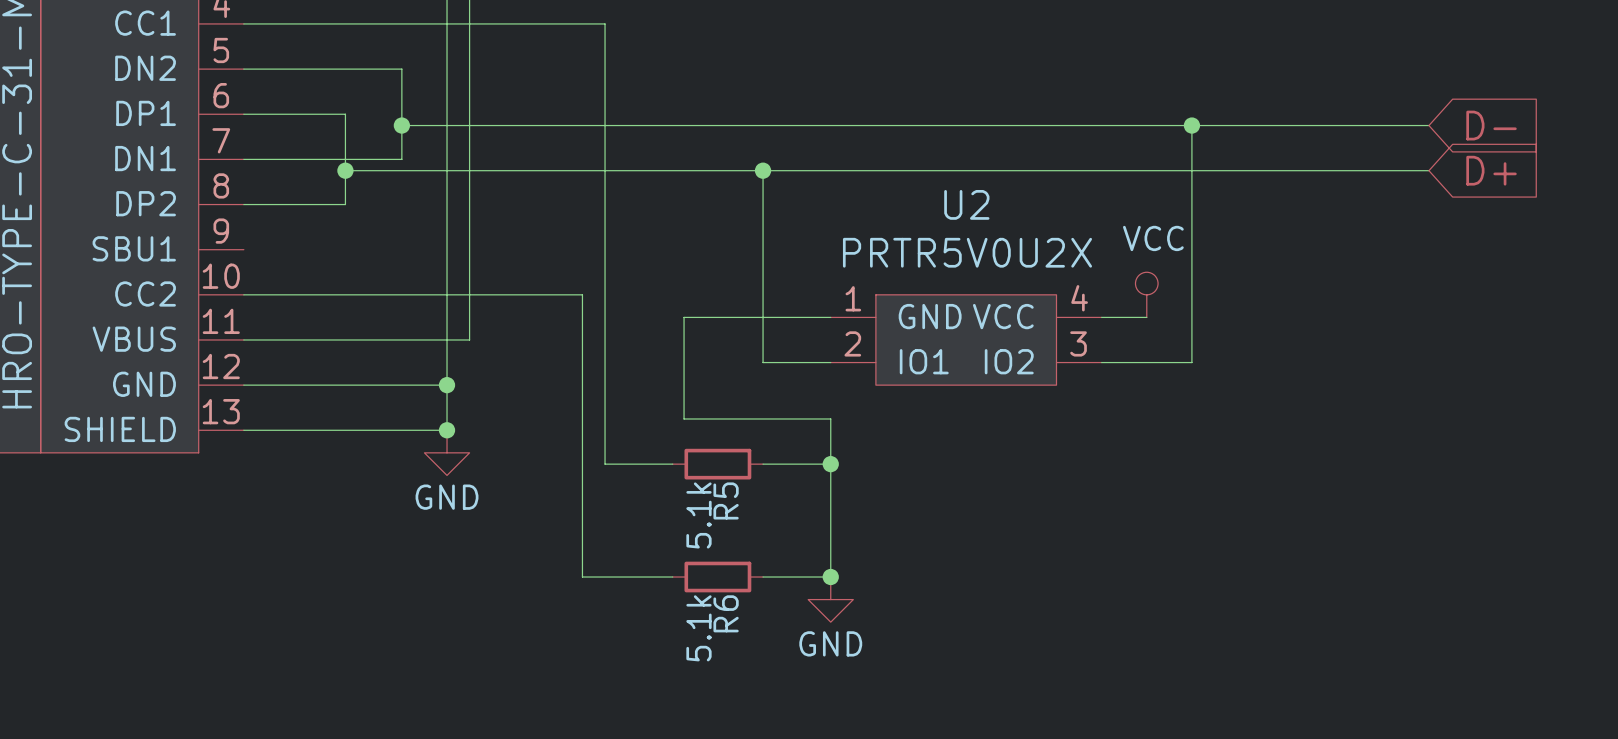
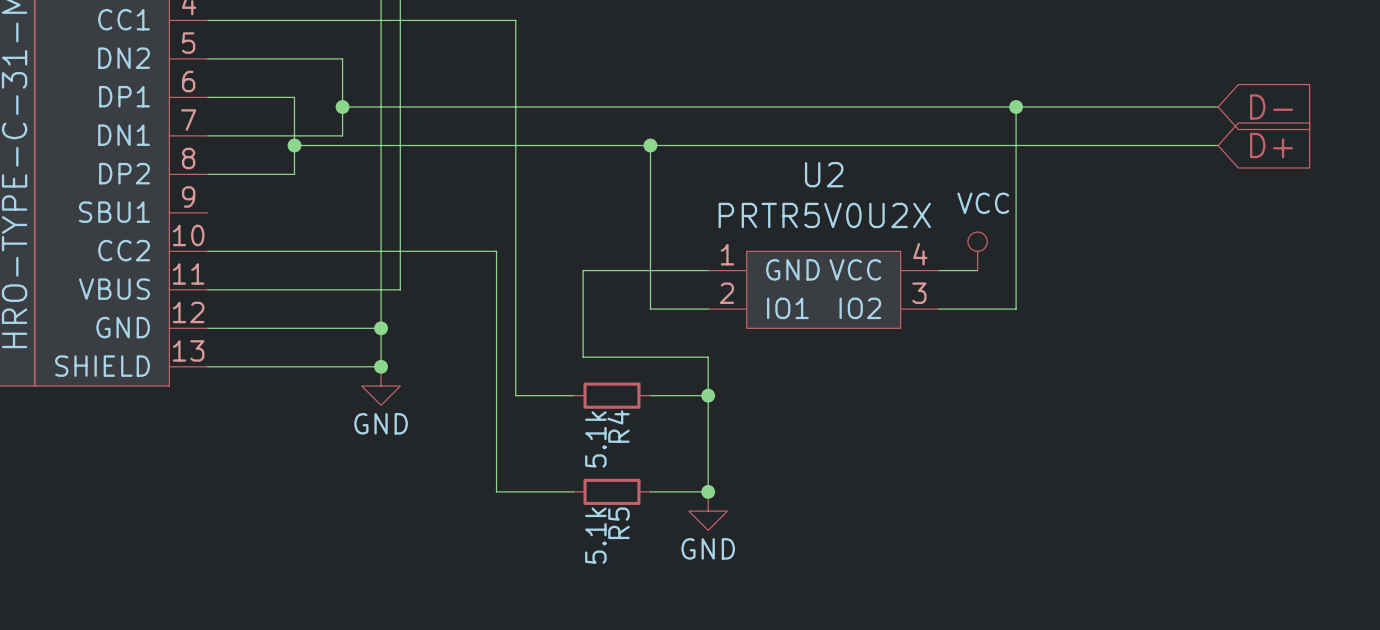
R5 name: R5 (726, 500) -> R4 (618, 426)
R6 name: R6 (726, 613) -> R5 (618, 523)

